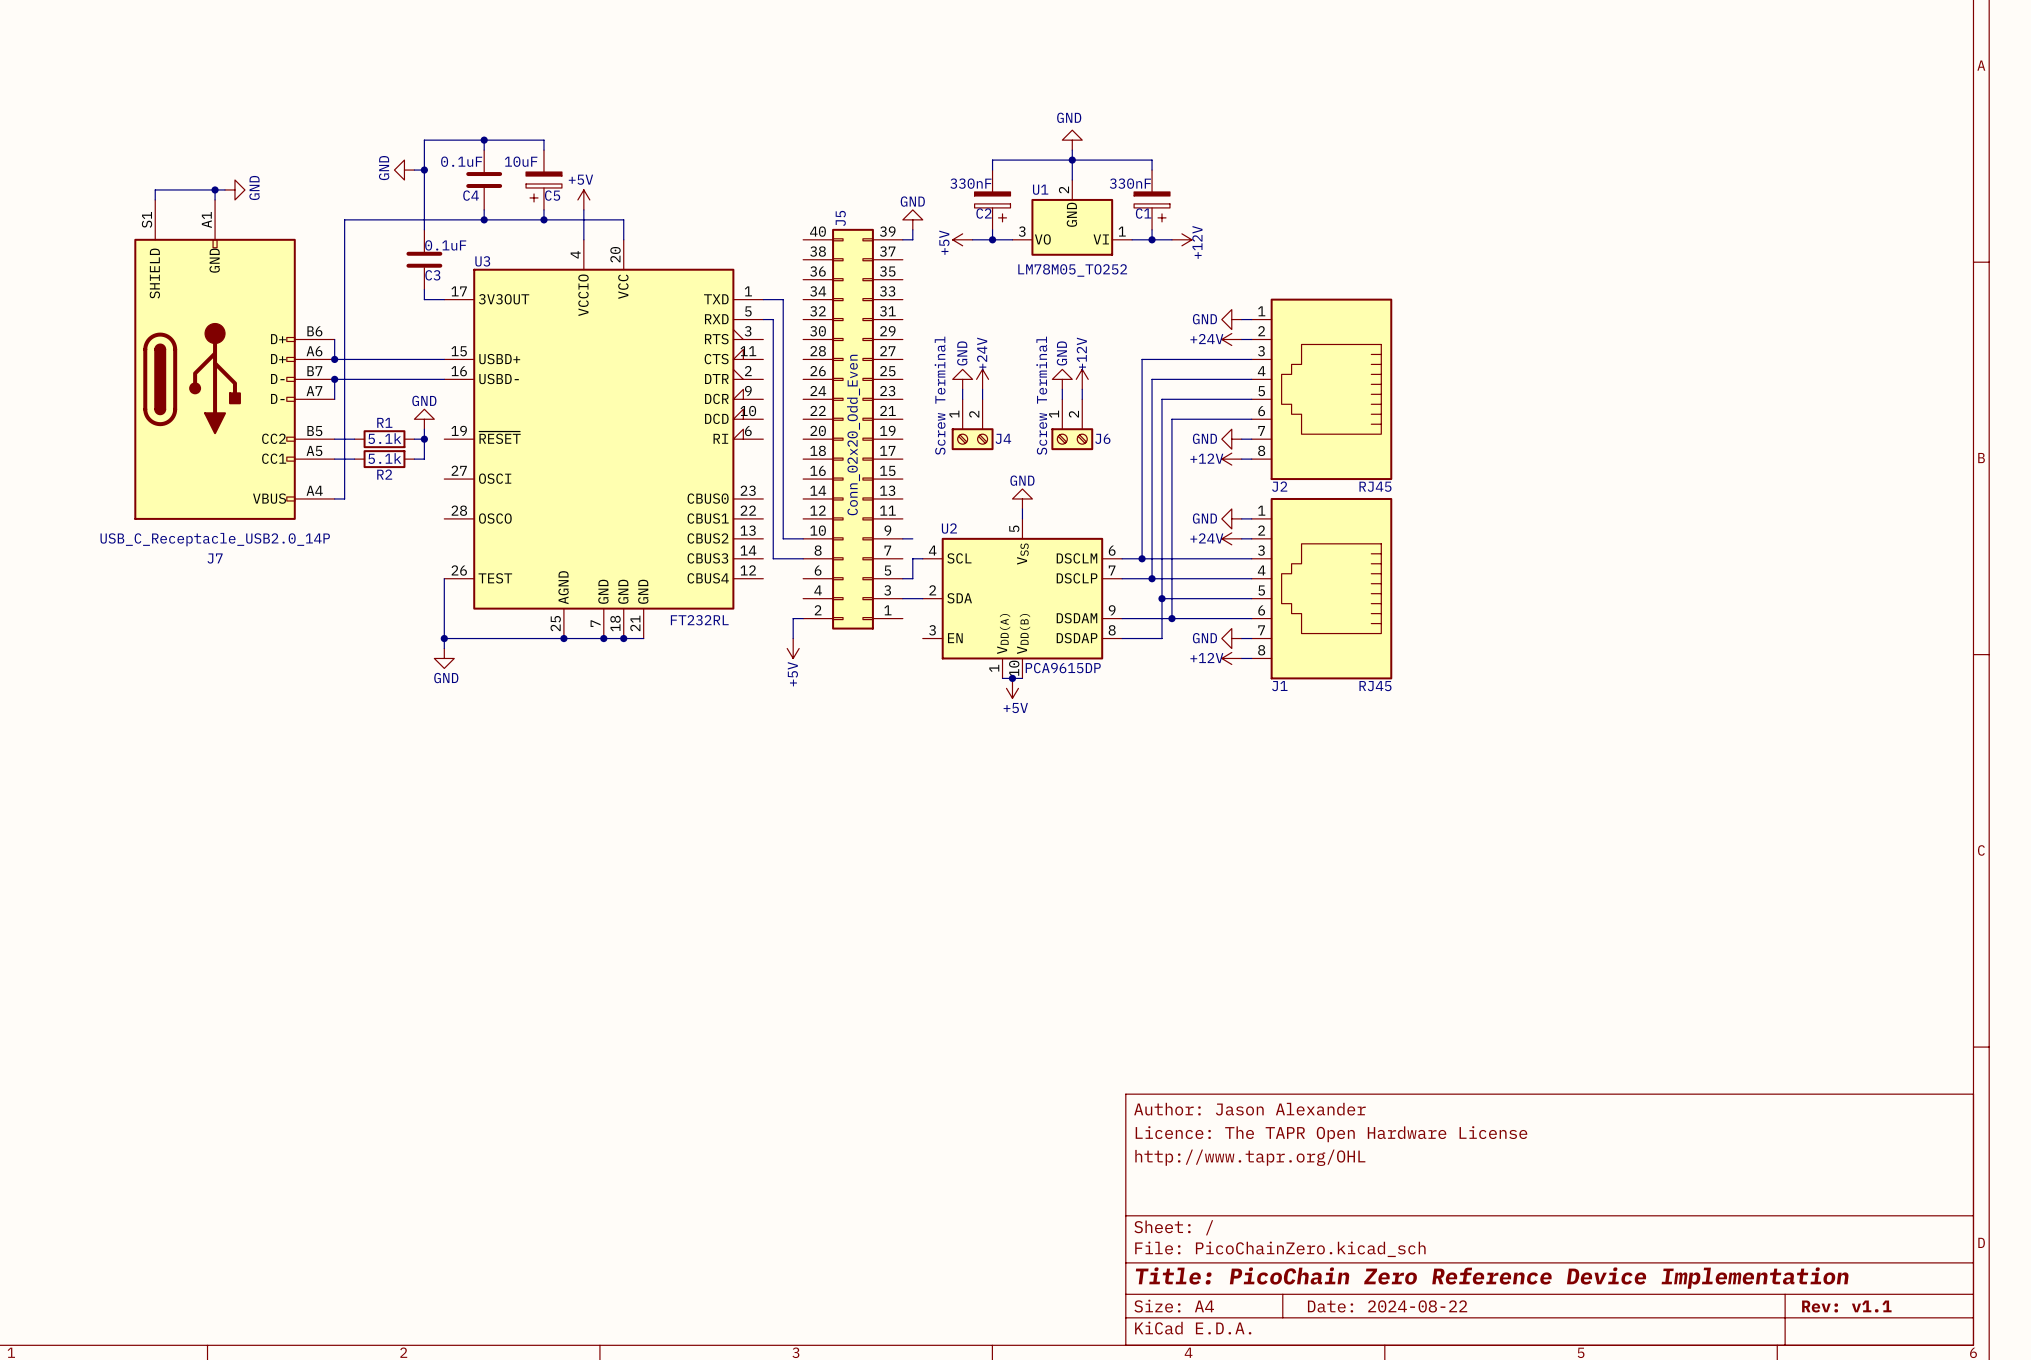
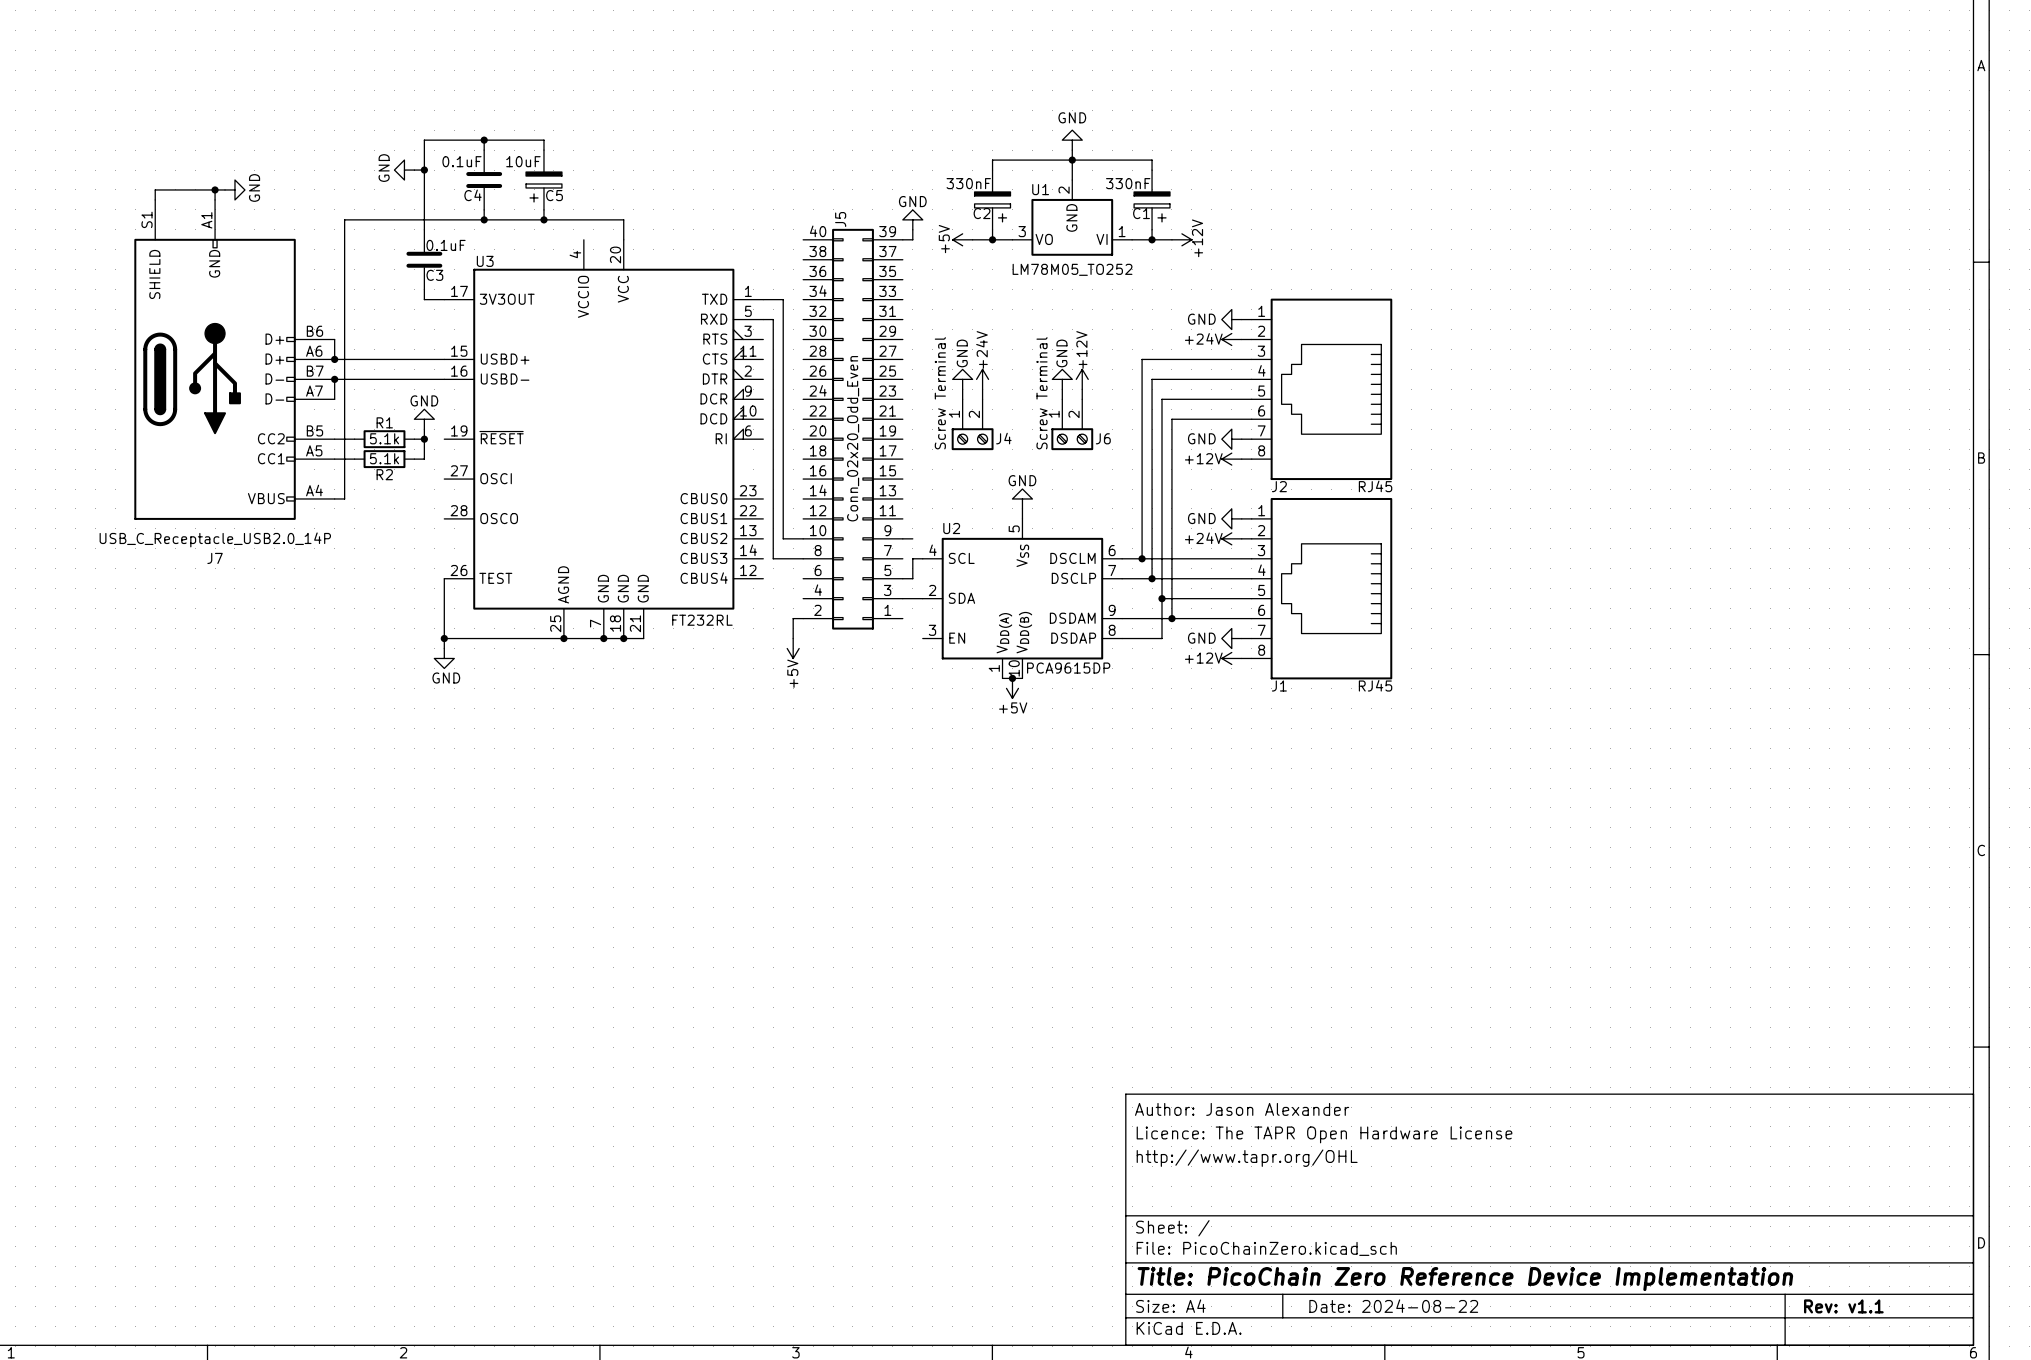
power symbol: +5V (583, 199) -> none
wire: (583, 209) (583, 239) -> none

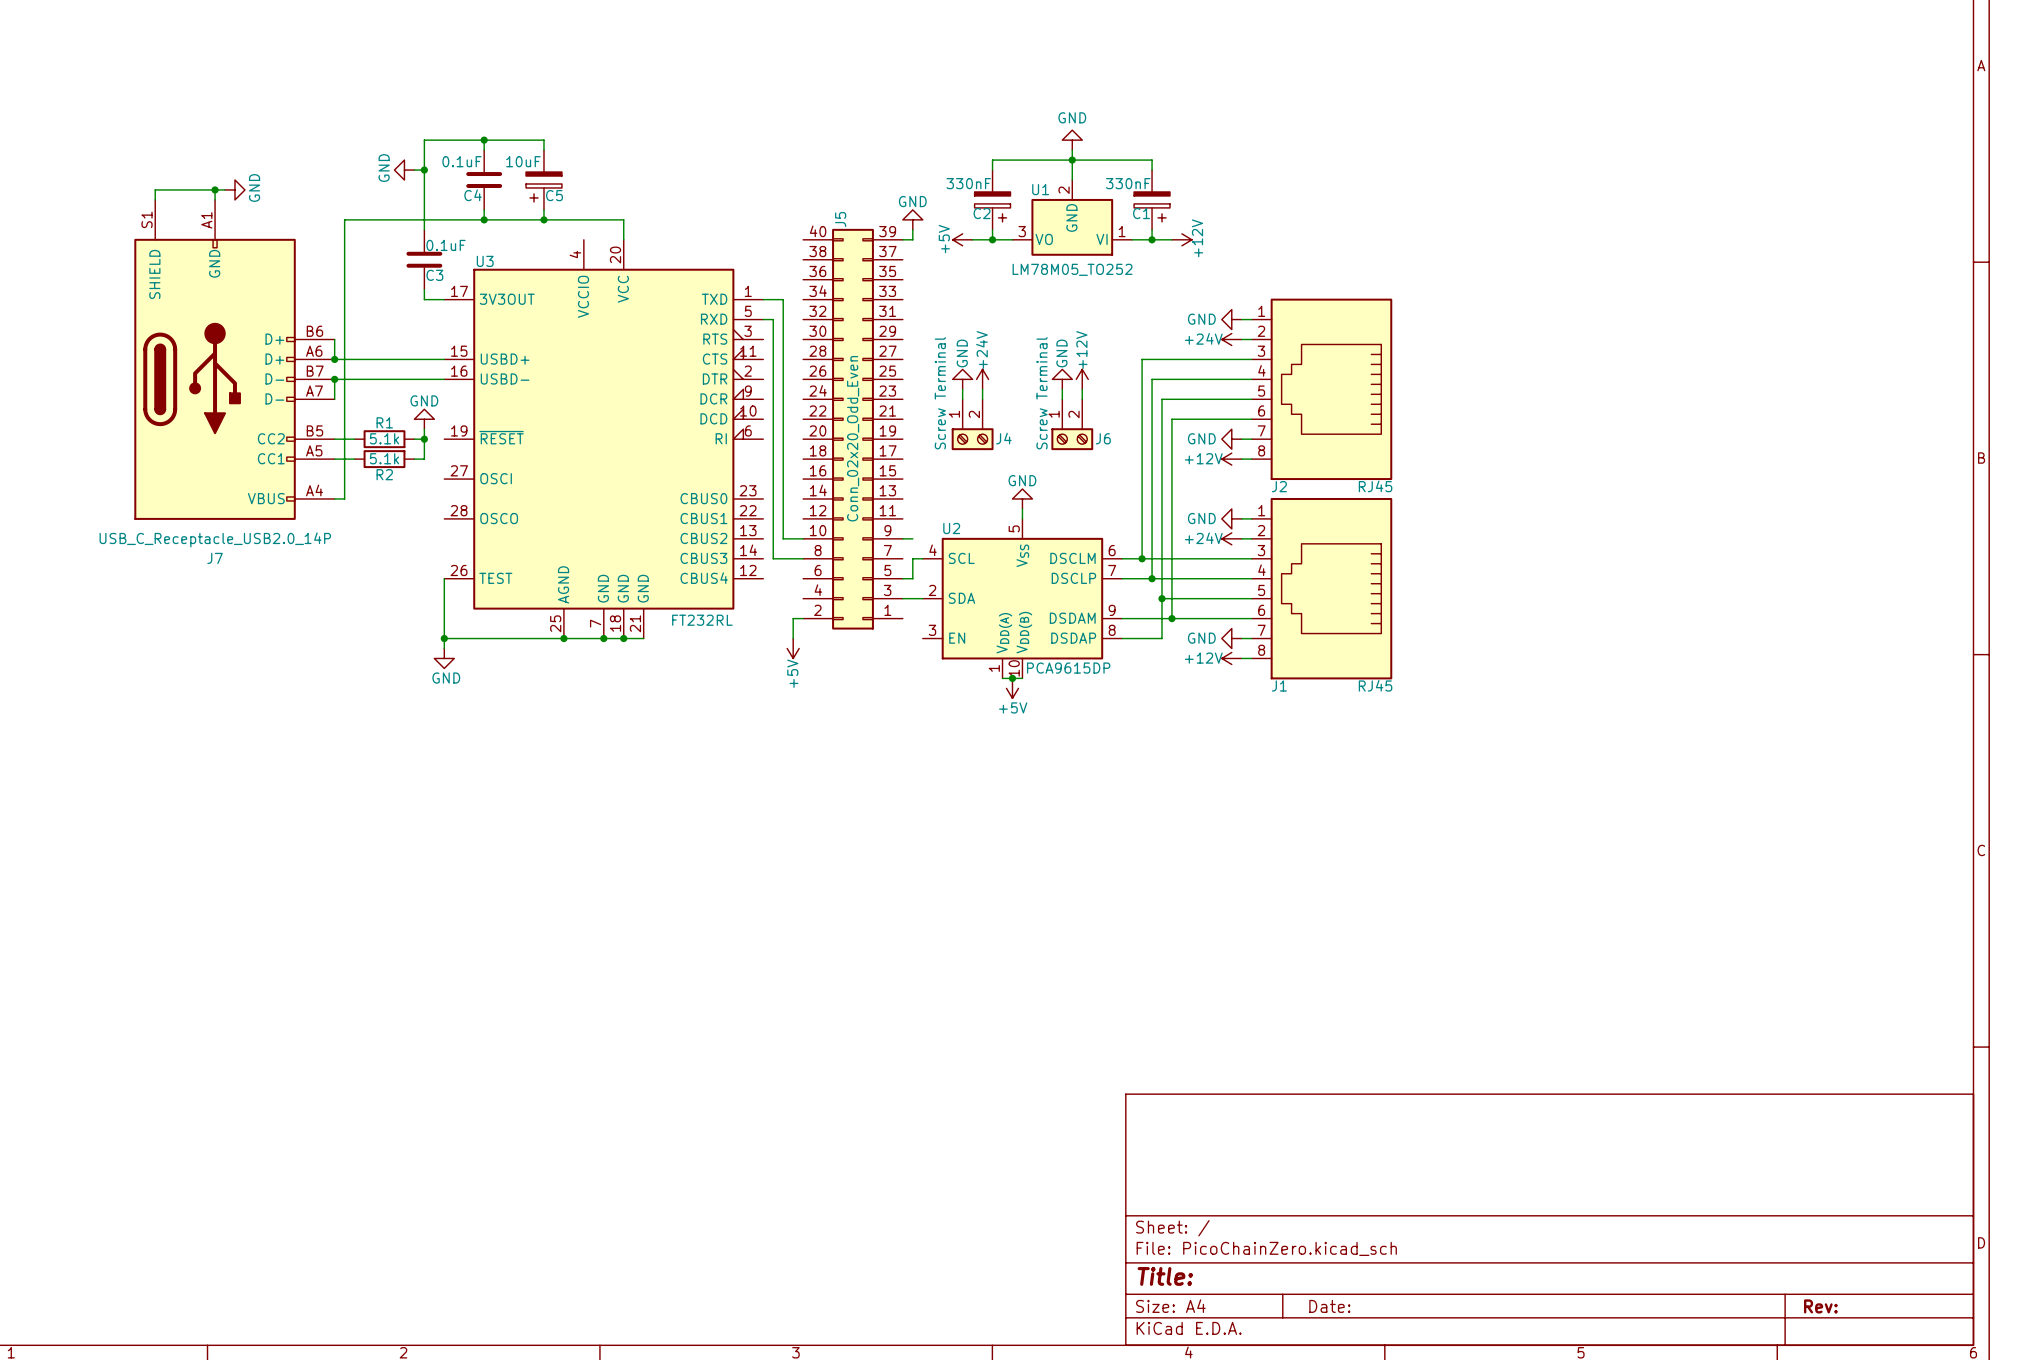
title block: Author: Jason Alexander (1242, 1109) -> none
title block: Licence: The TAPR Open Hardware License (1324, 1134) -> none
title block: http://www.tapr.org/OHL (1247, 1158) -> none
title block: Title: PicoChain Zero Reference Device Implementation (1465, 1279) -> Title: (1165, 1276)
title block: Date: 2024-08-22 (1393, 1306) -> Date: (1329, 1306)
title block: Rev: v1.1 (1843, 1306) -> Rev: (1820, 1306)

